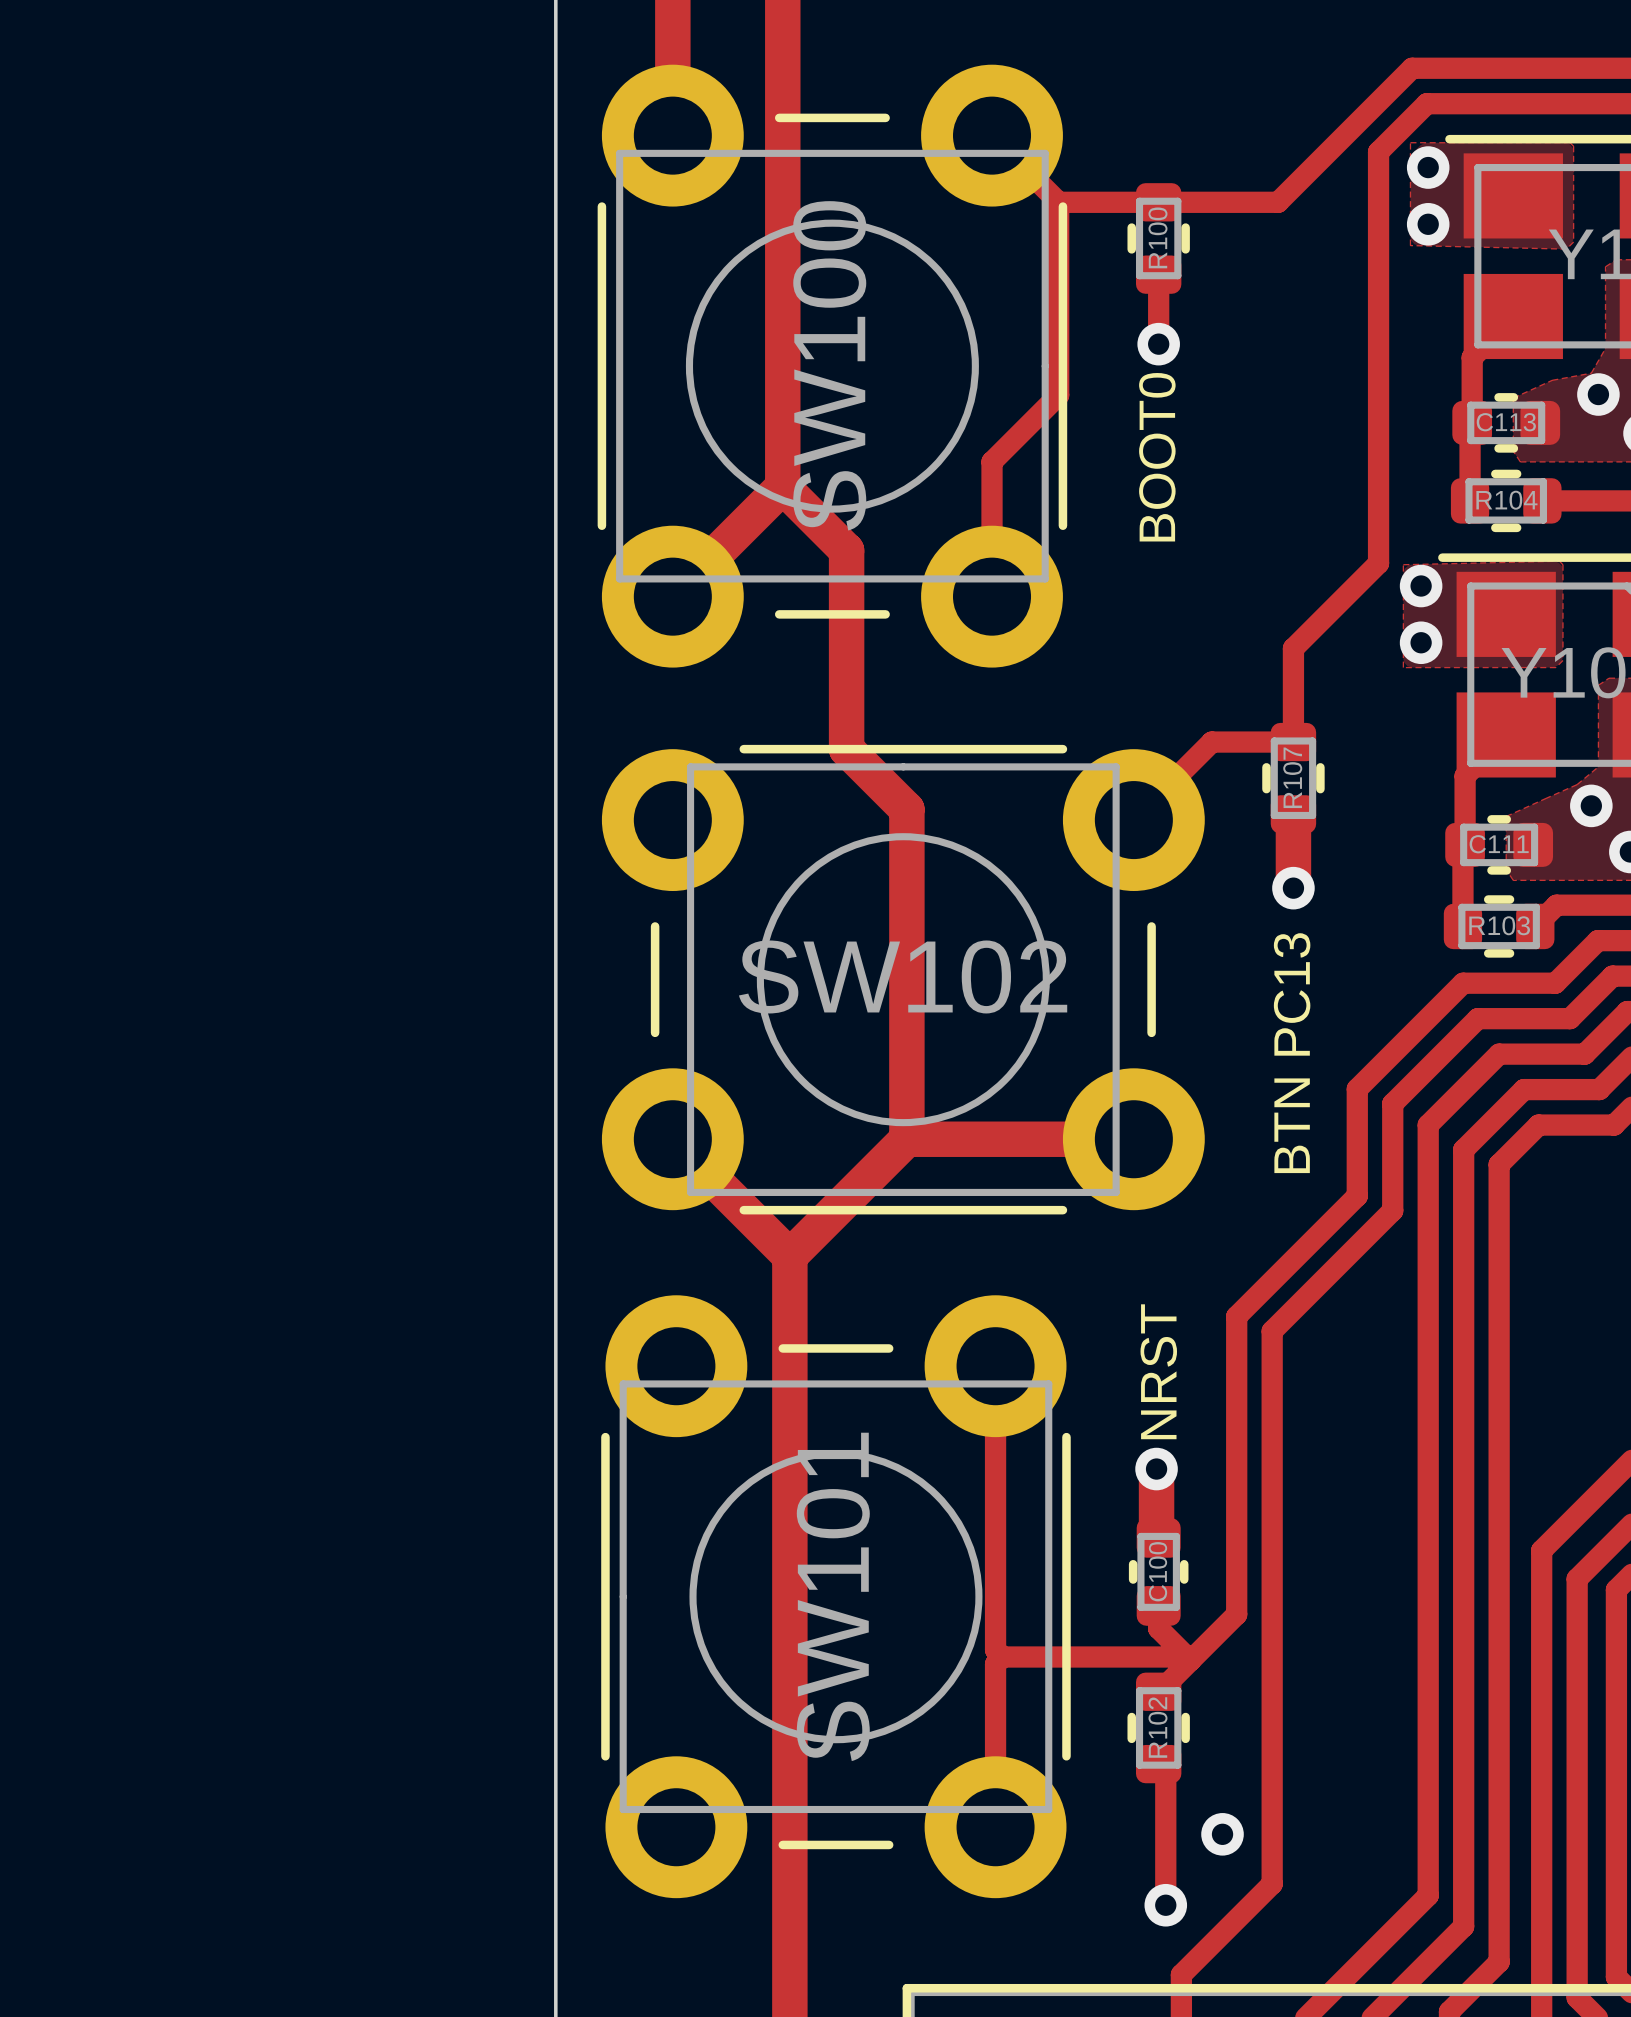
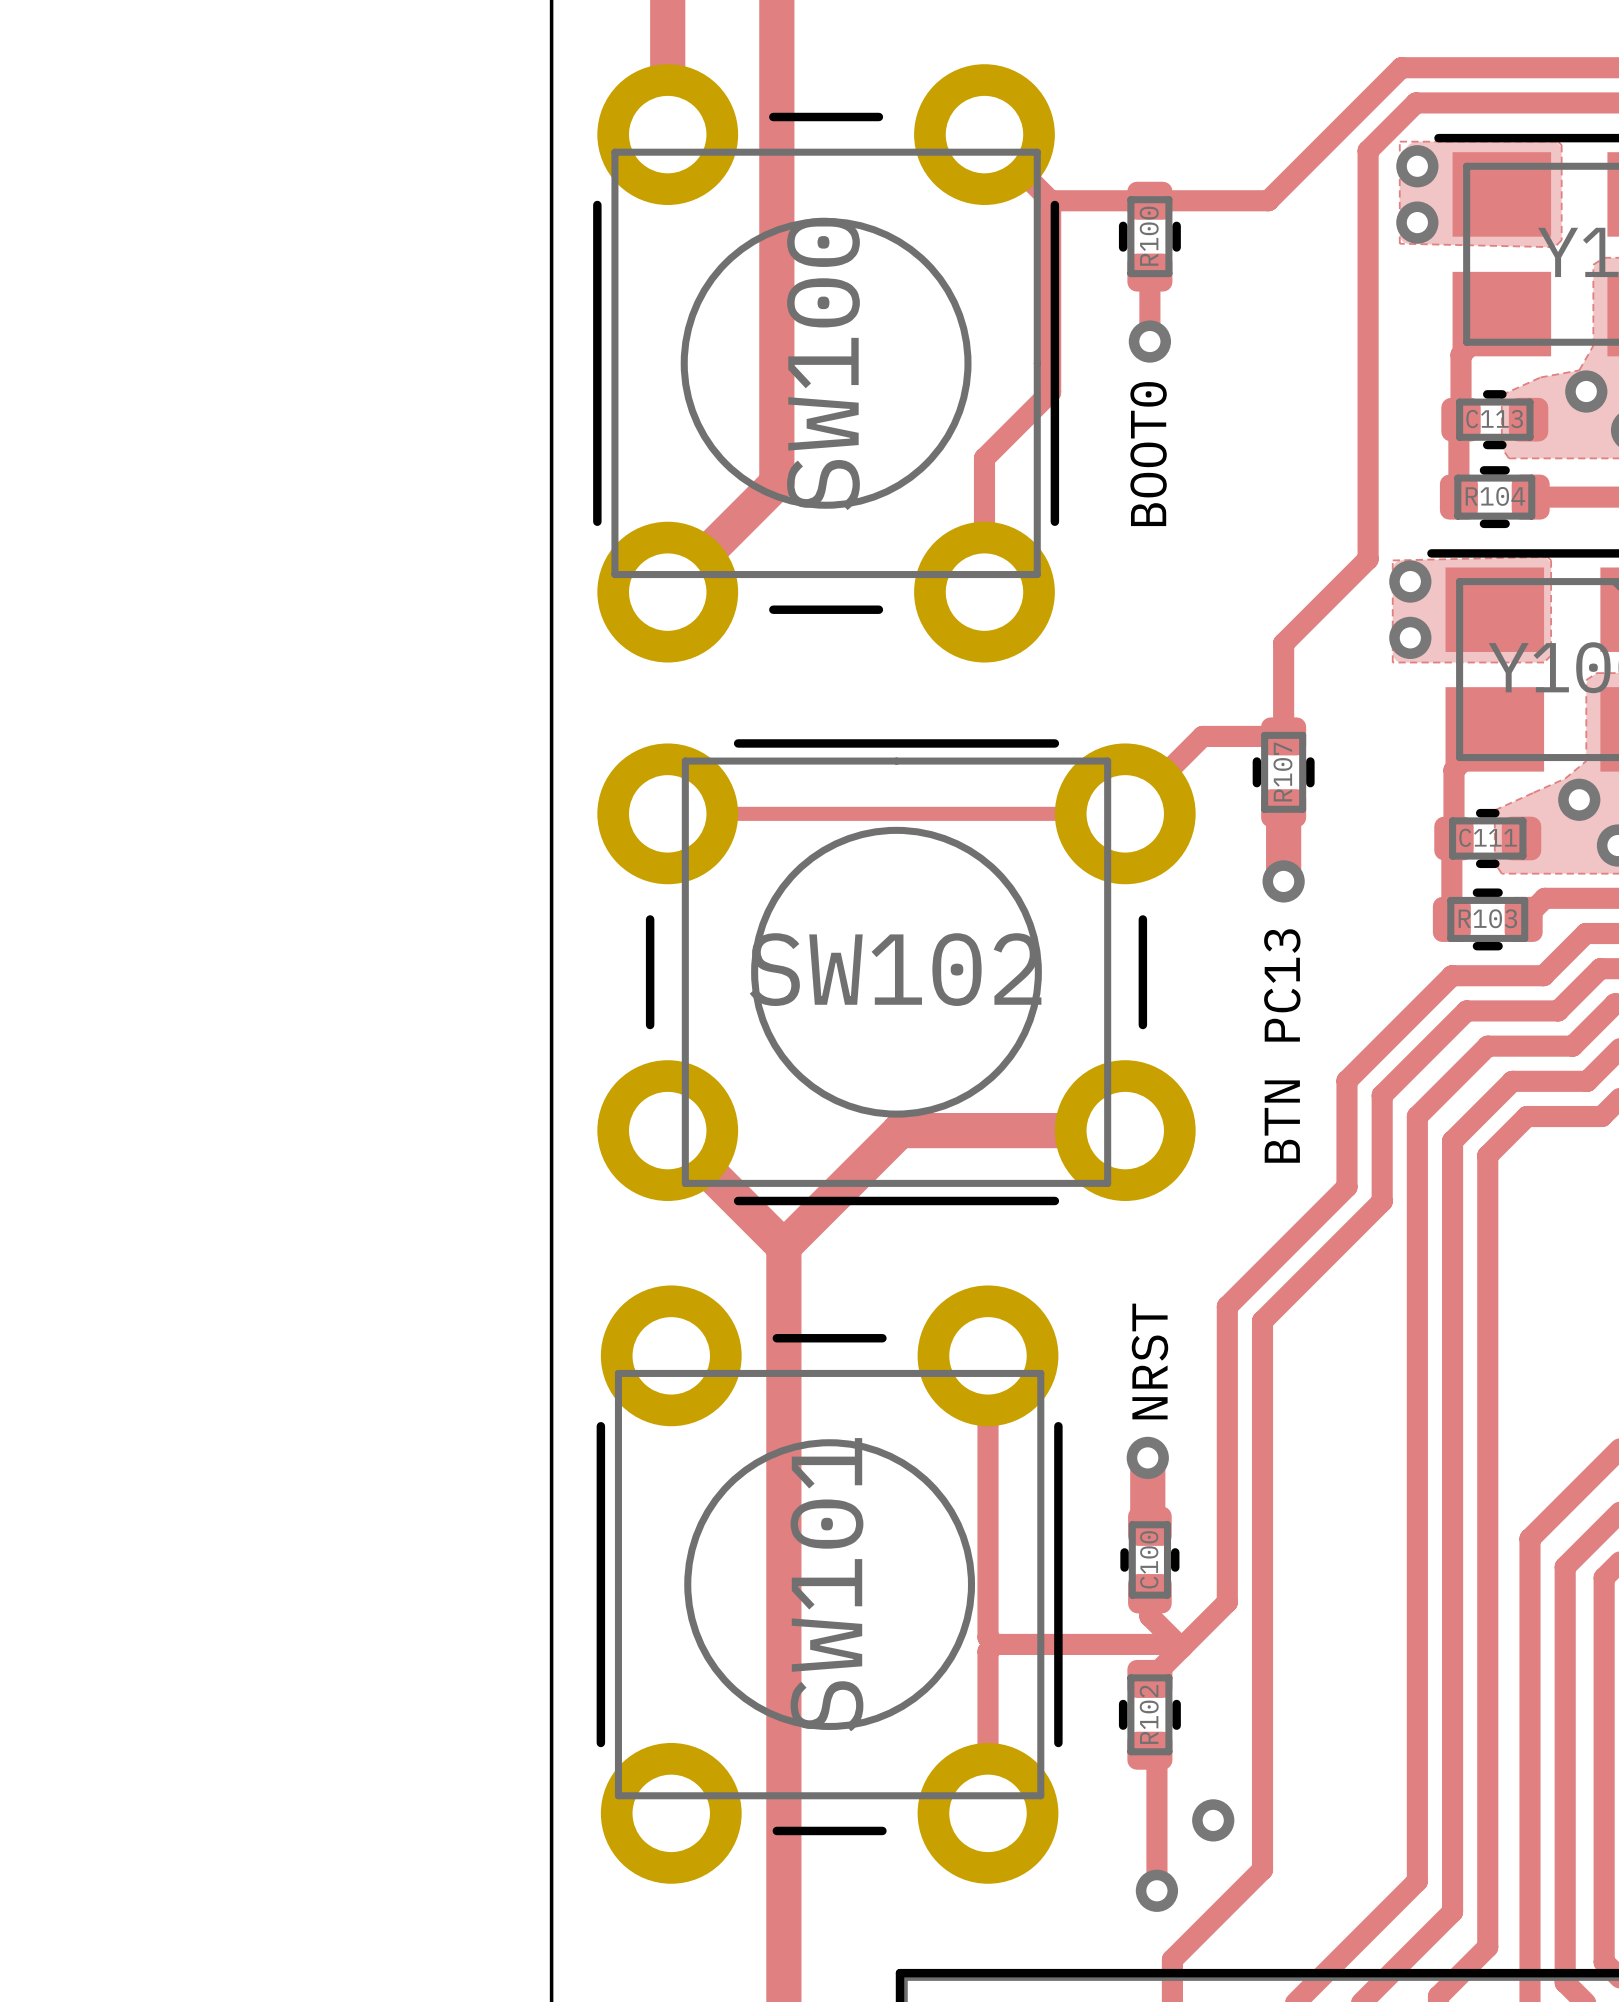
track: (782, 486) (846, 550) (846, 749) (906, 809) (906, 1139) -> none
track: none -> (667, 813) (1125, 813)

